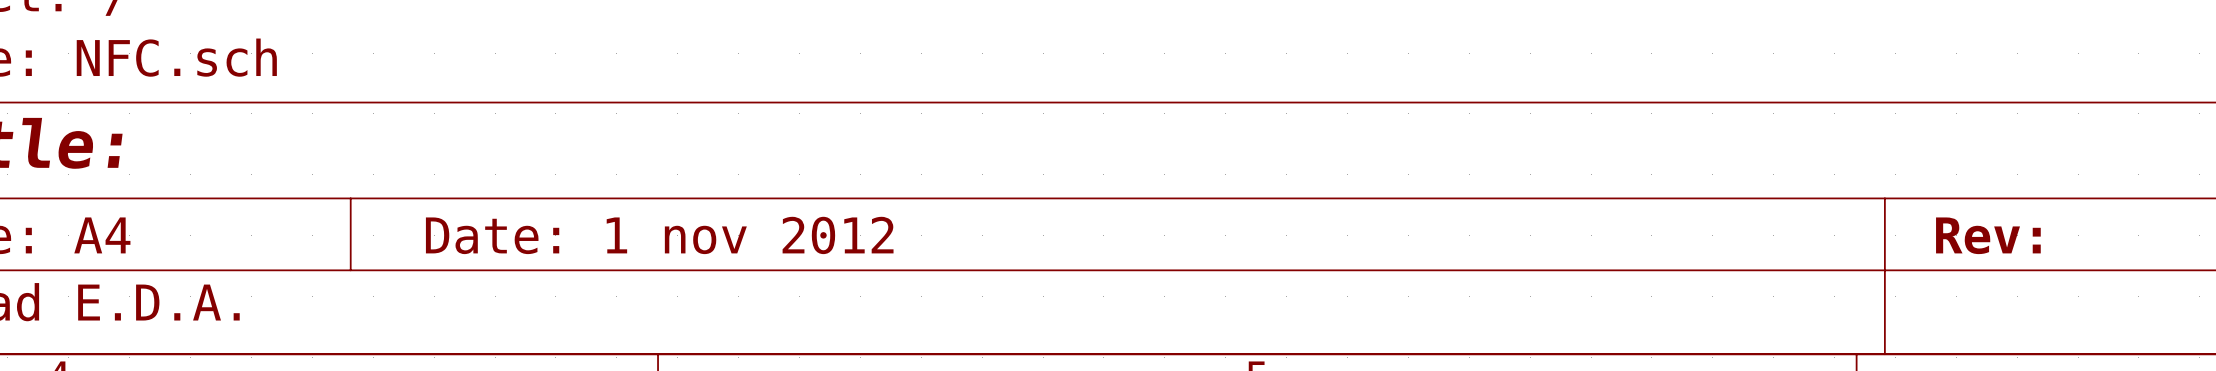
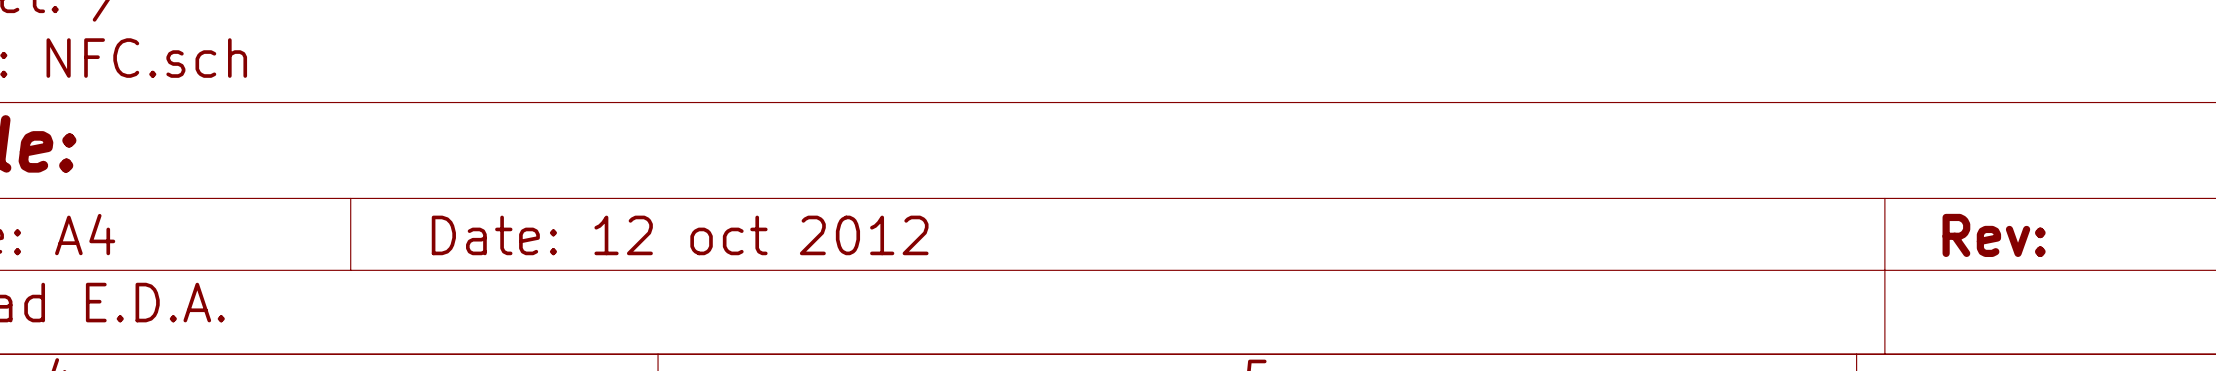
title block: Date: 1 nov 2012 (659, 235) -> Date: 12 oct 2012 (680, 235)

